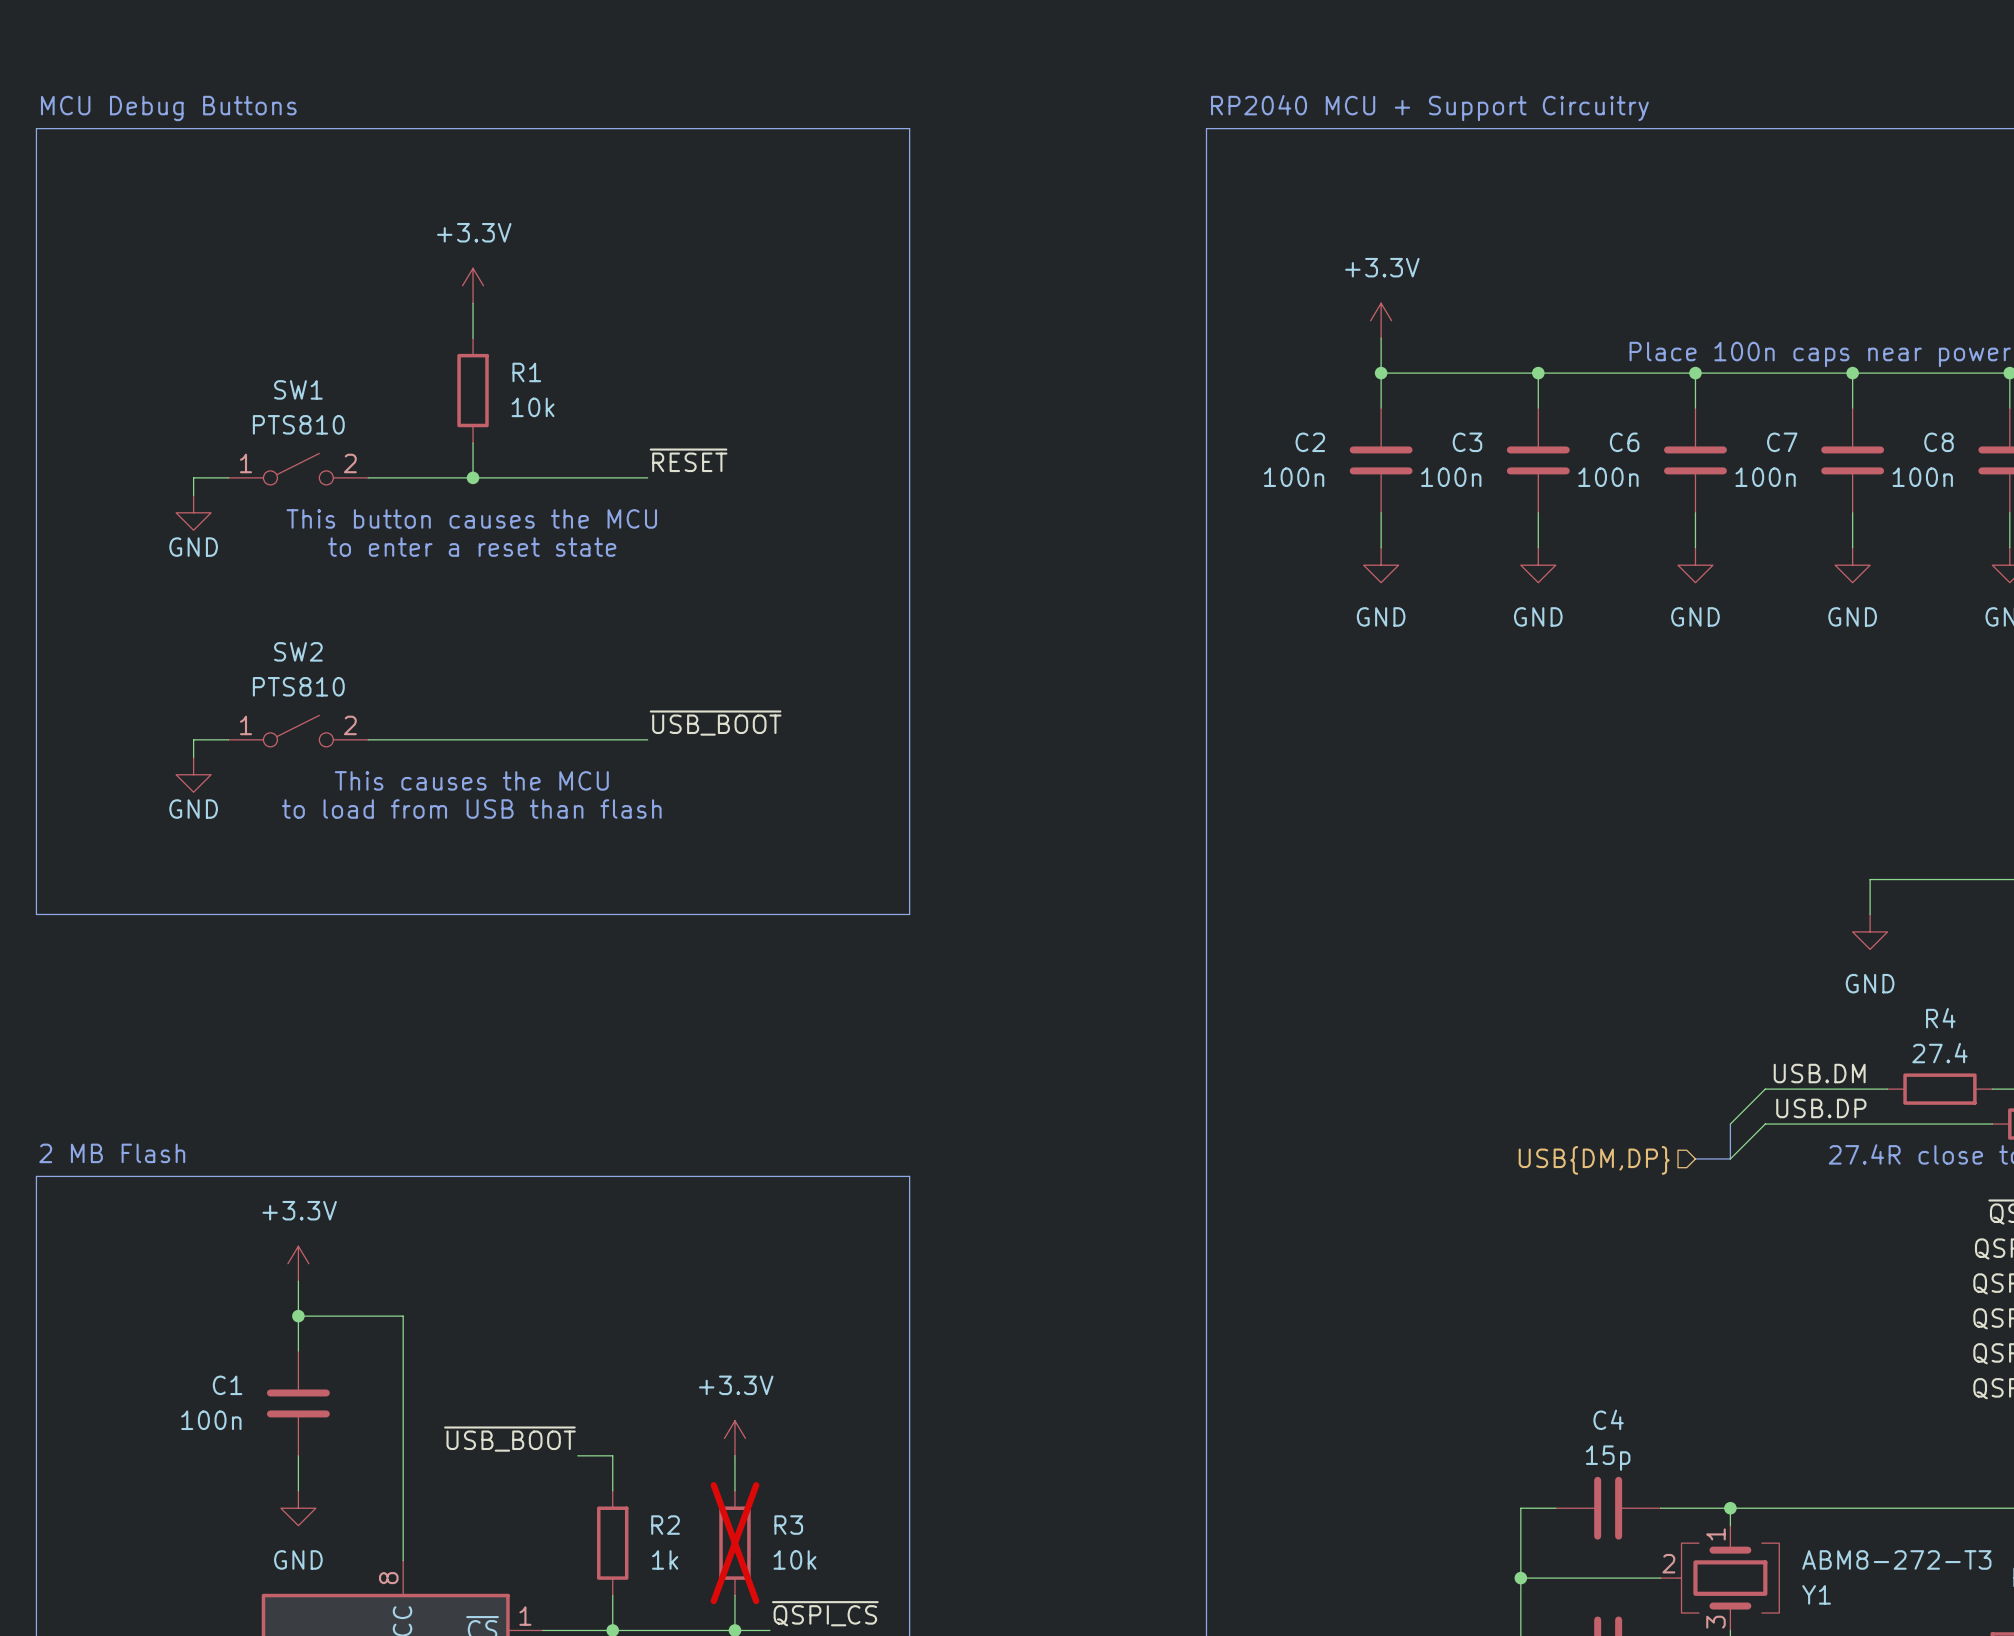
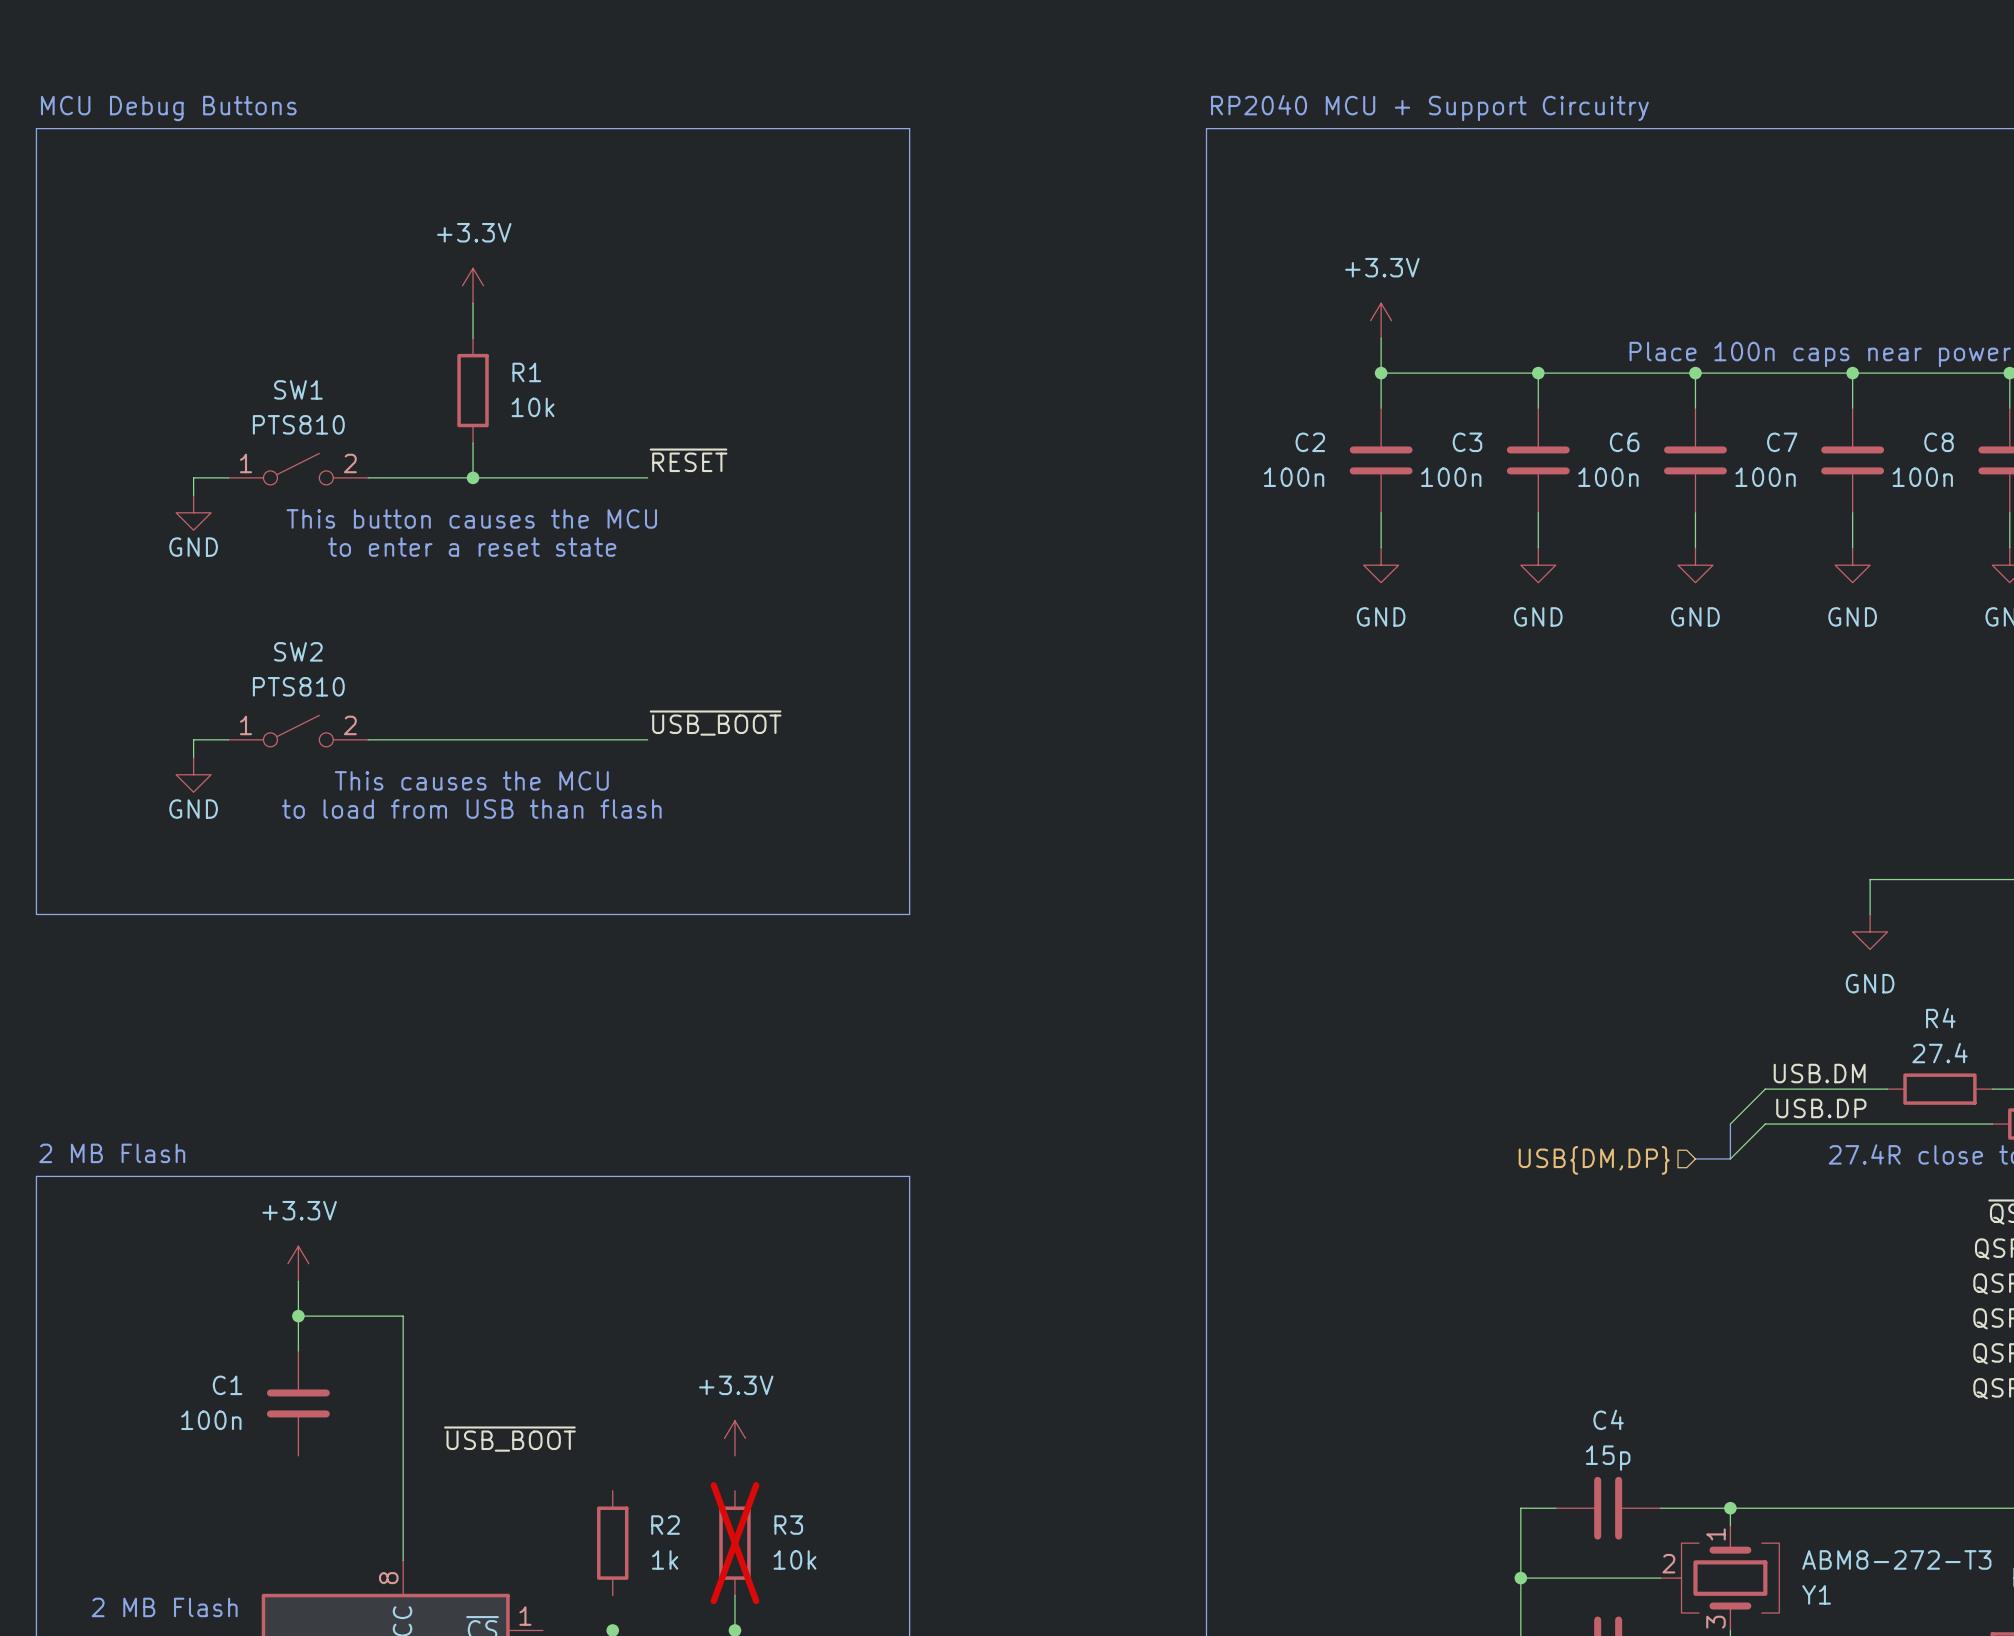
wire: (298, 1455) (298, 1490) -> none
wire: (577, 1455) (612, 1455) (612, 1490) -> none
wire: (734, 1455) (734, 1490) -> none
power symbol: GND (298, 1508) -> none
wire: (612, 1595) (612, 1630) -> none
text: none -> 2 MB Flash (164, 1607)
label: ~{QSPI_CS} (825, 1613) -> none
wire: (542, 1630) (769, 1630) -> none

